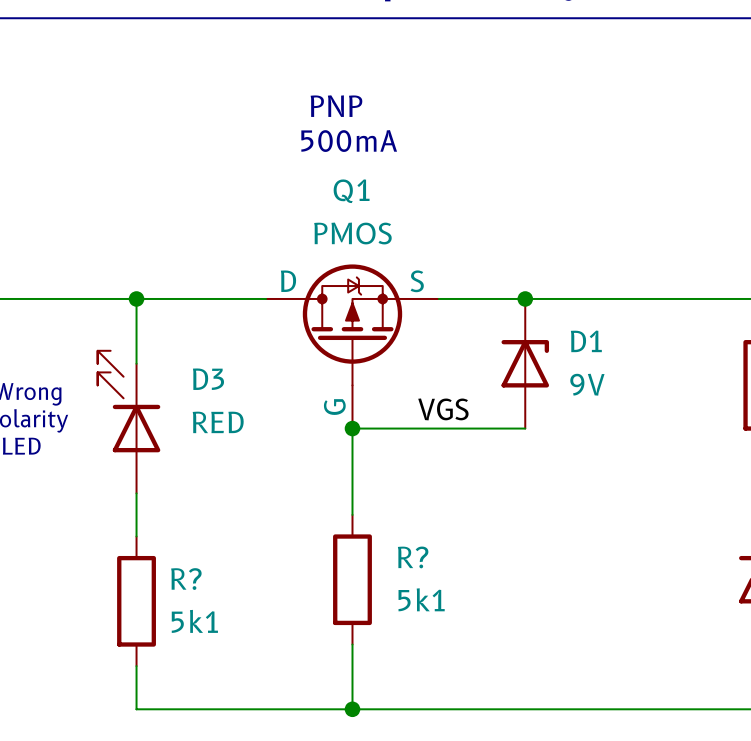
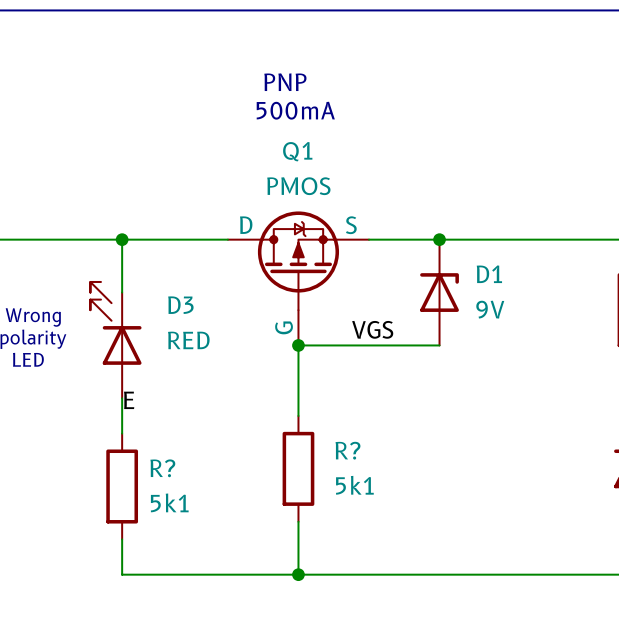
label: none -> E (129, 400)

